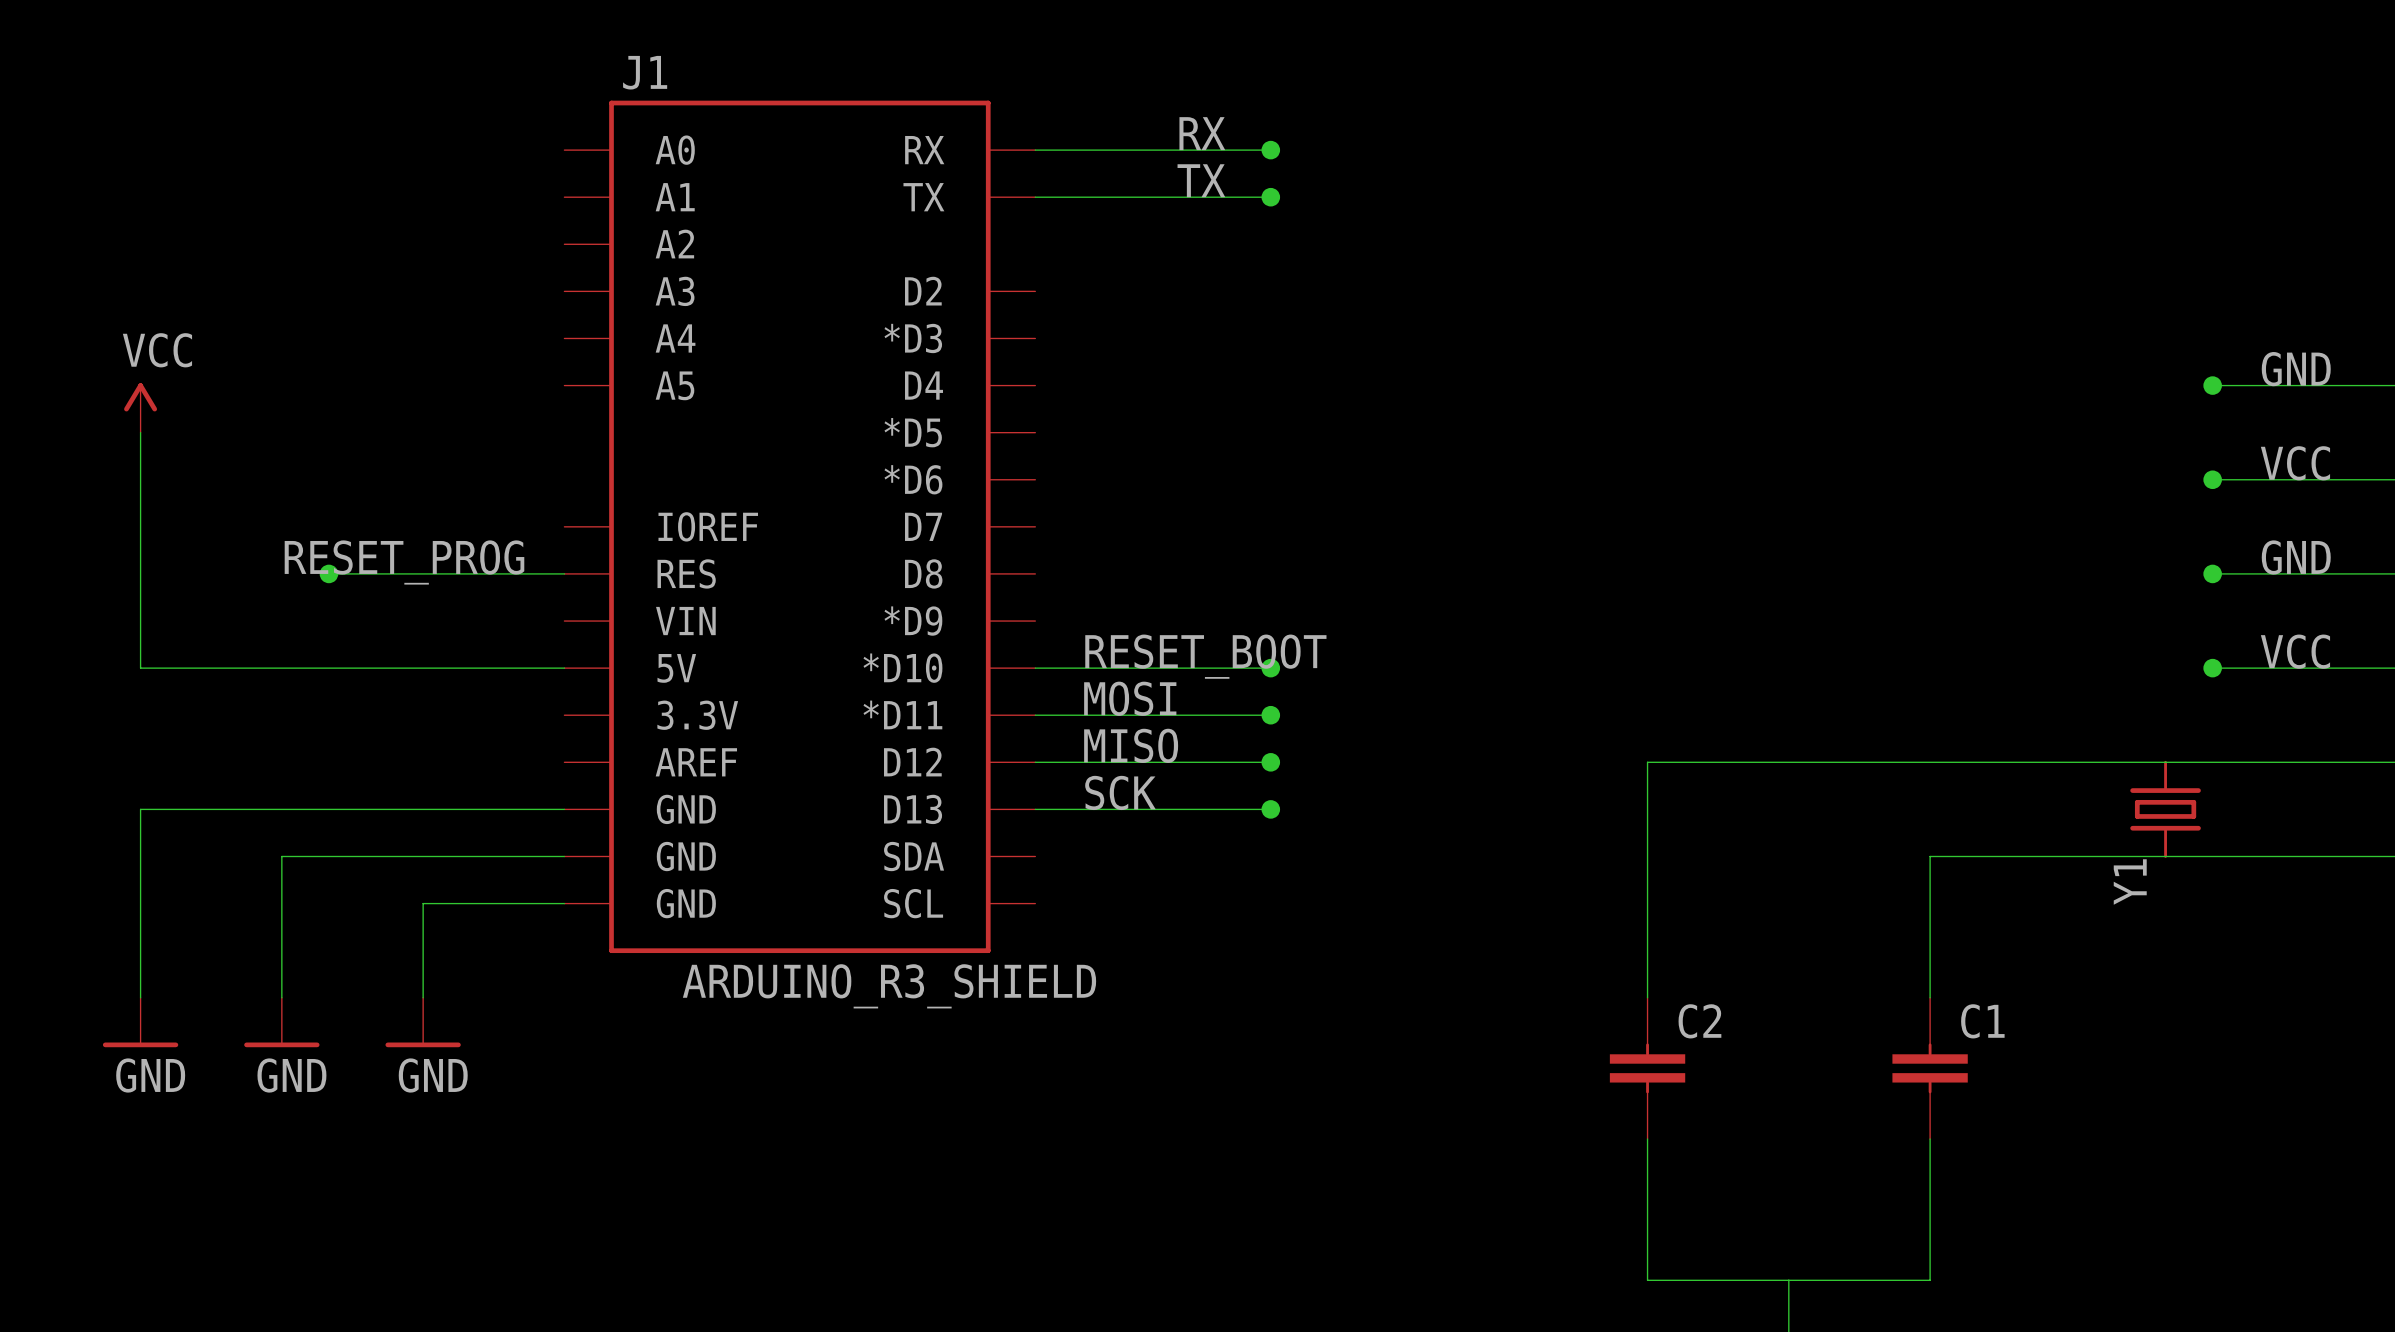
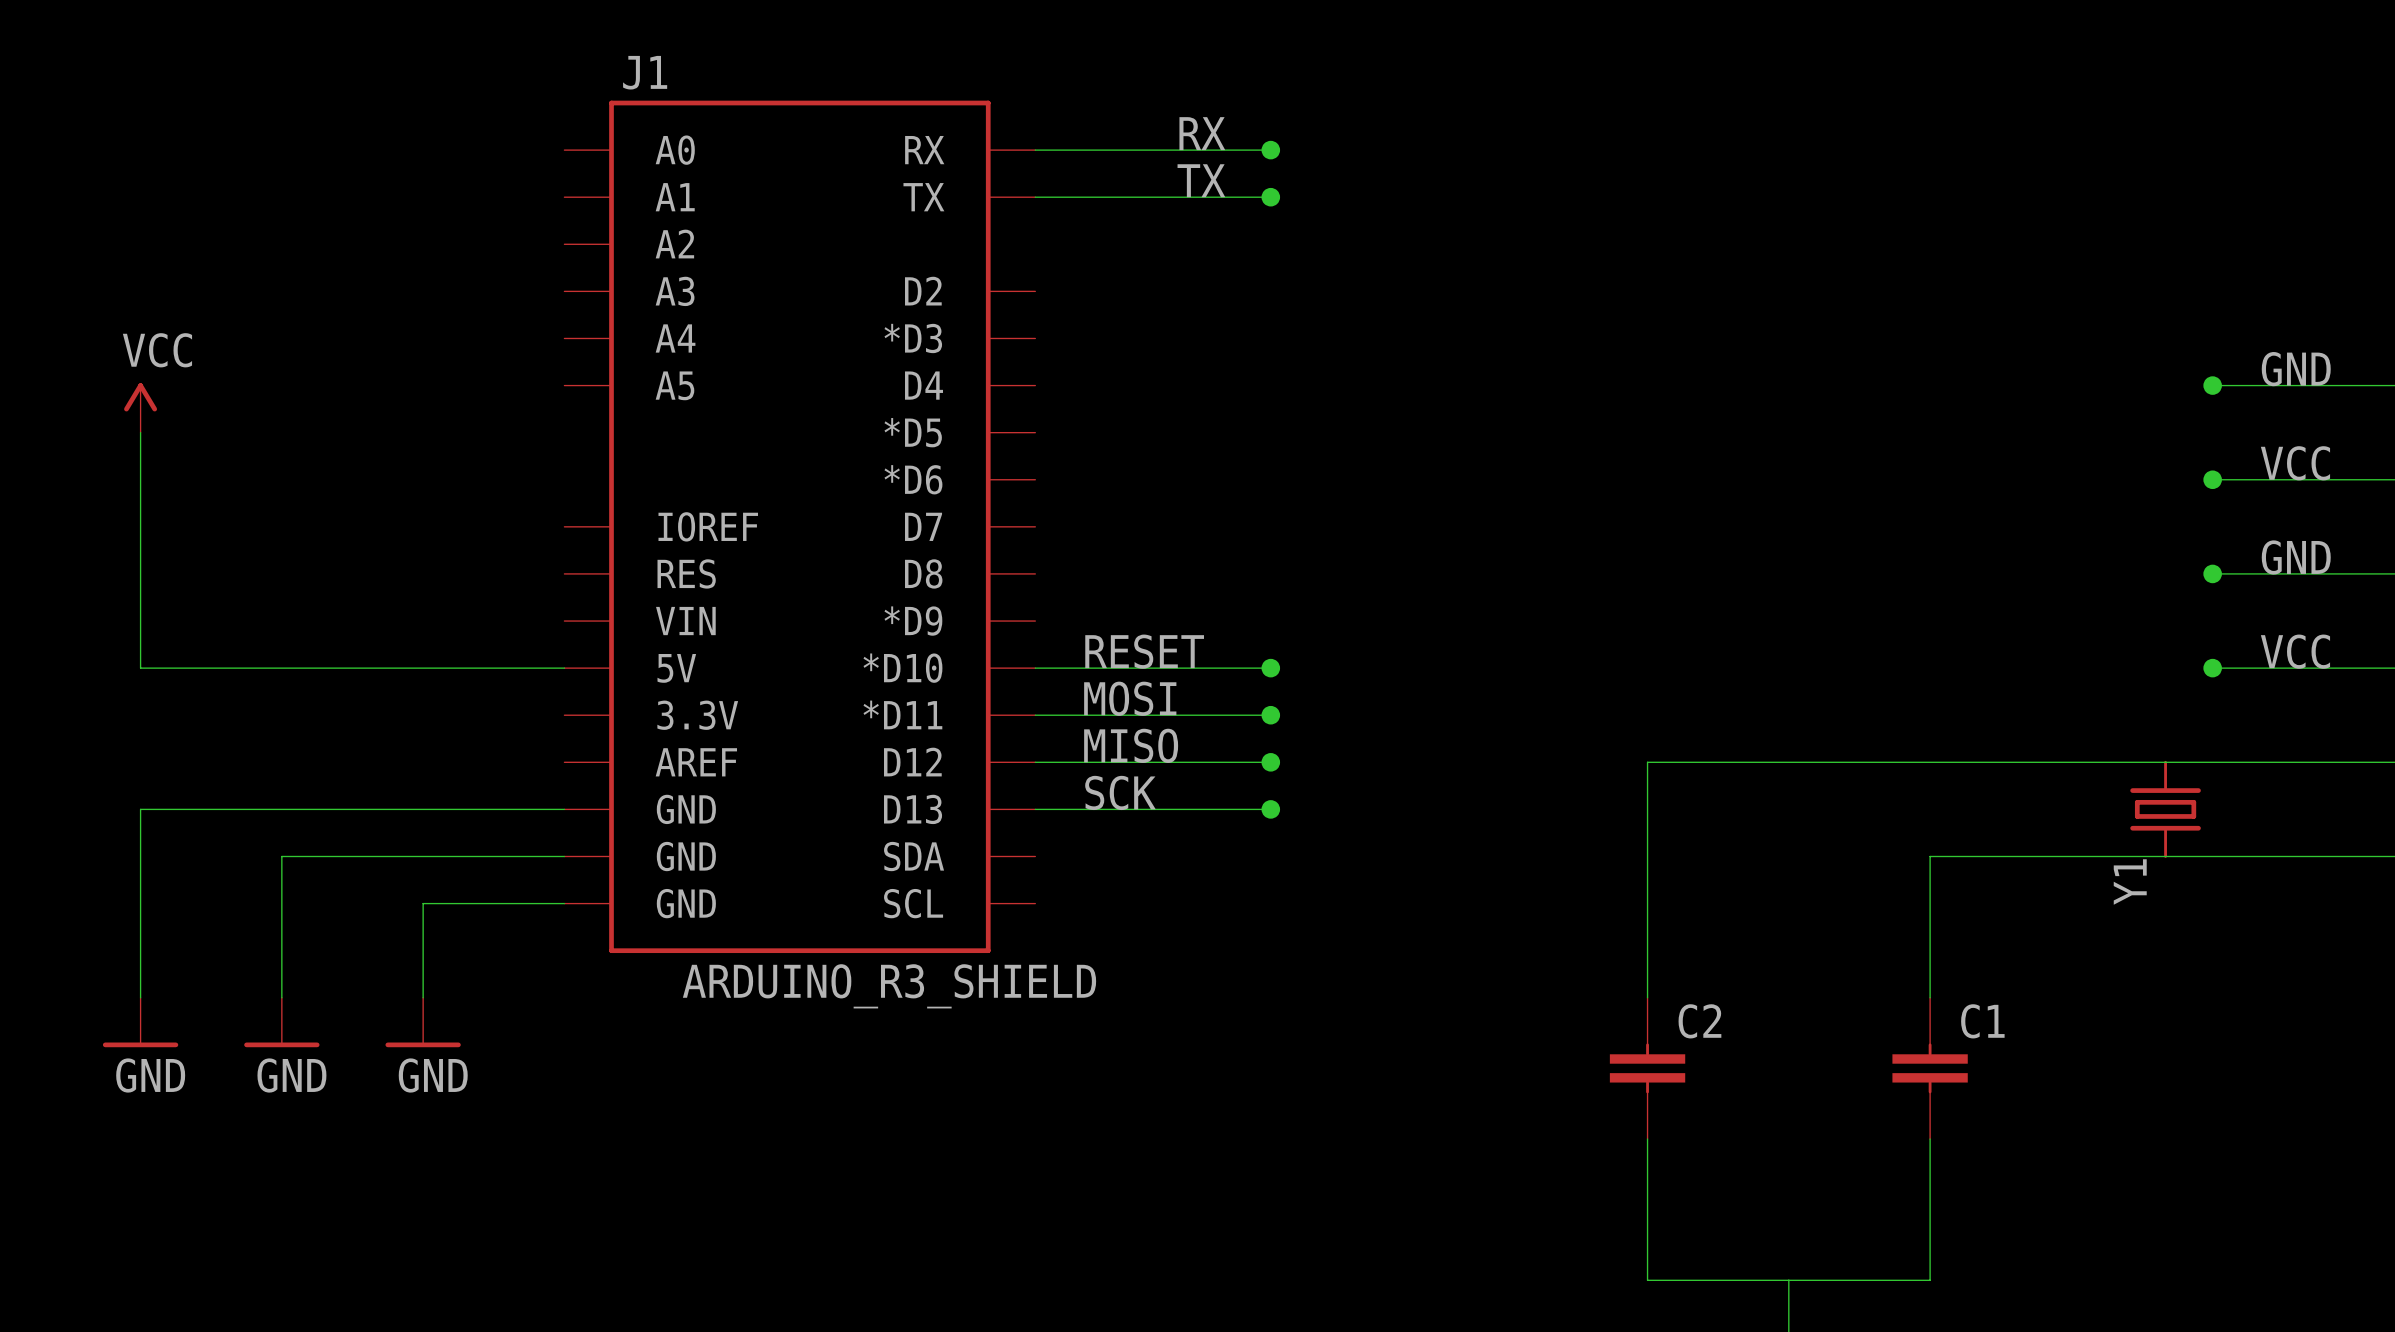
label: RESET_PROG (404, 562) -> none
wire: (328, 573) (564, 573) -> none
junction: (328, 573) -> none
label: RESET_BOOT (1205, 656) -> RESET (1144, 651)

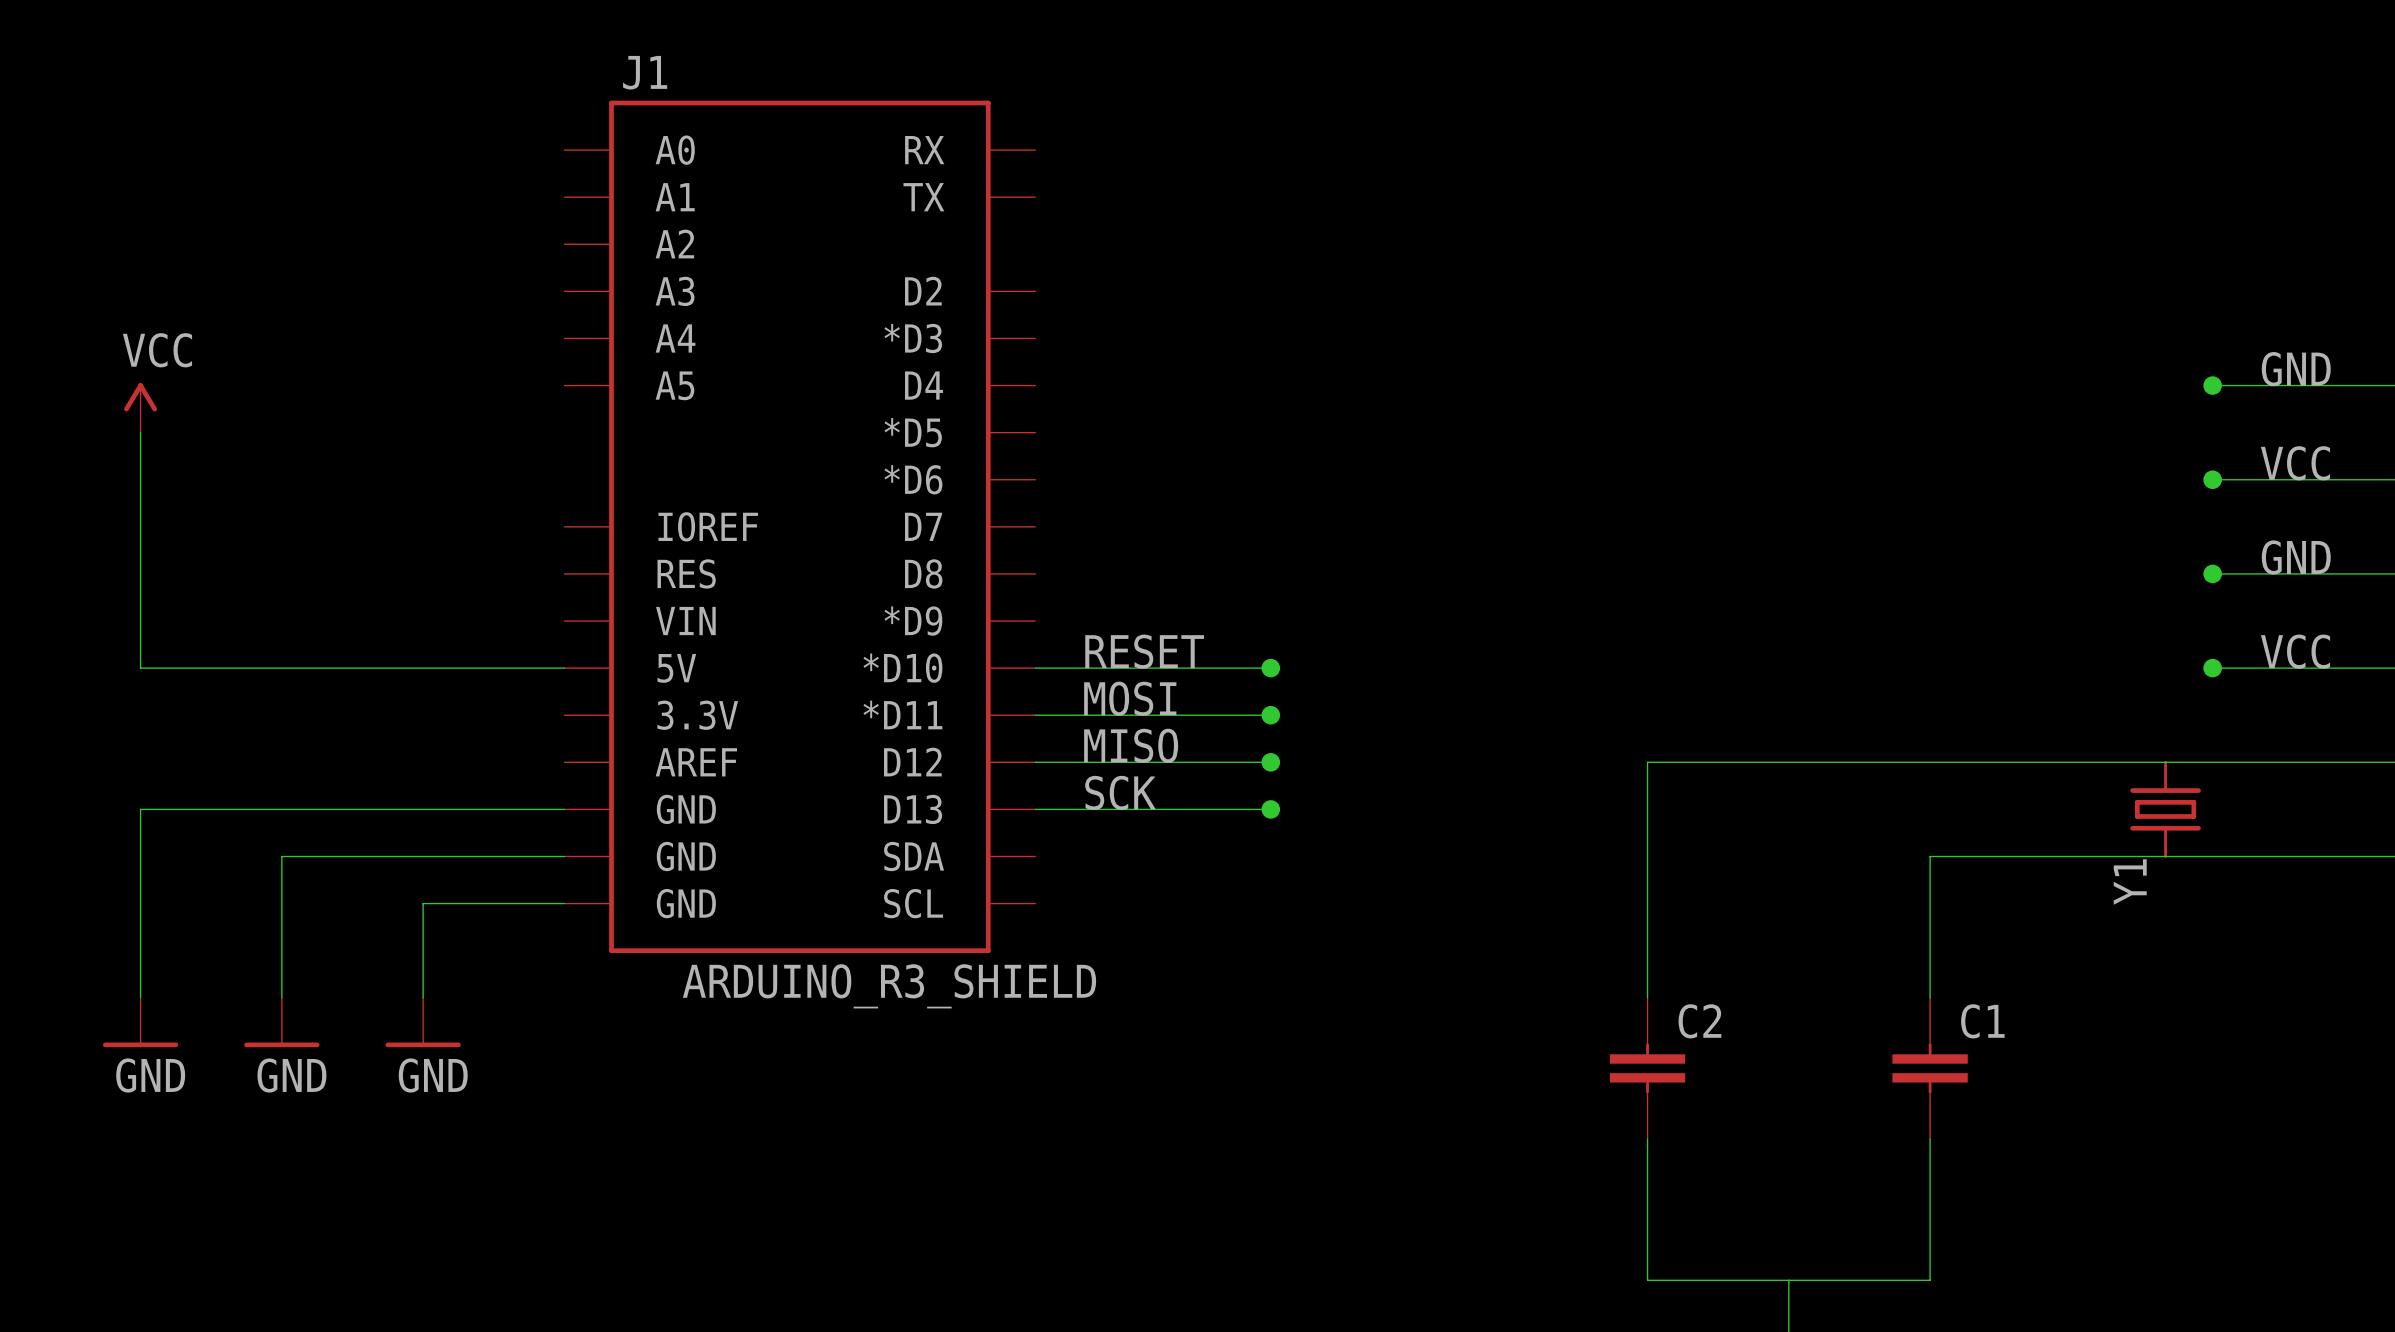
label: RX (1202, 133) -> none
wire: (1035, 150) (1270, 150) -> none
junction: (1270, 150) -> none
label: TX (1201, 180) -> none
wire: (1035, 197) (1270, 197) -> none
junction: (1270, 197) -> none

